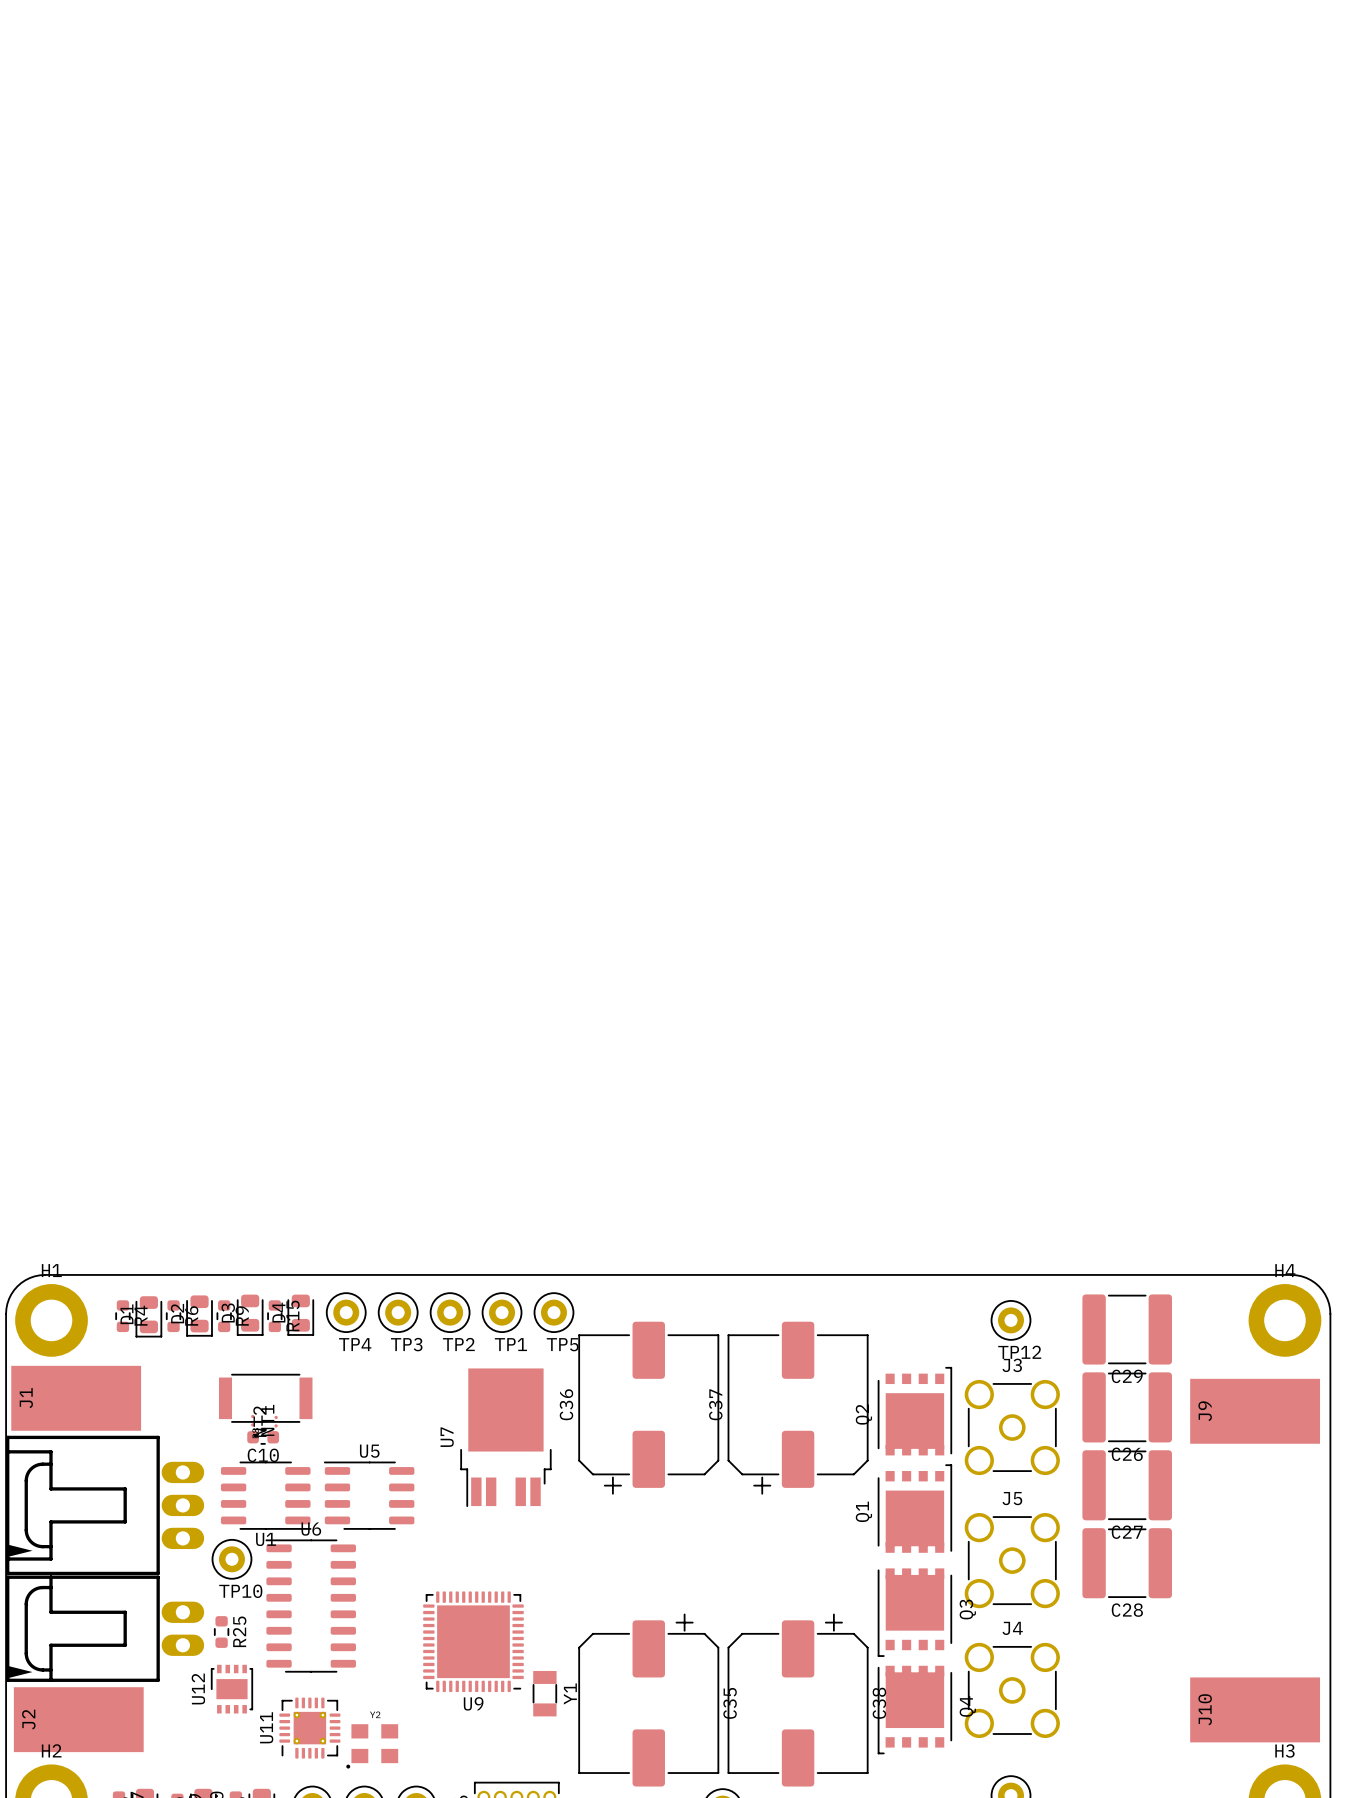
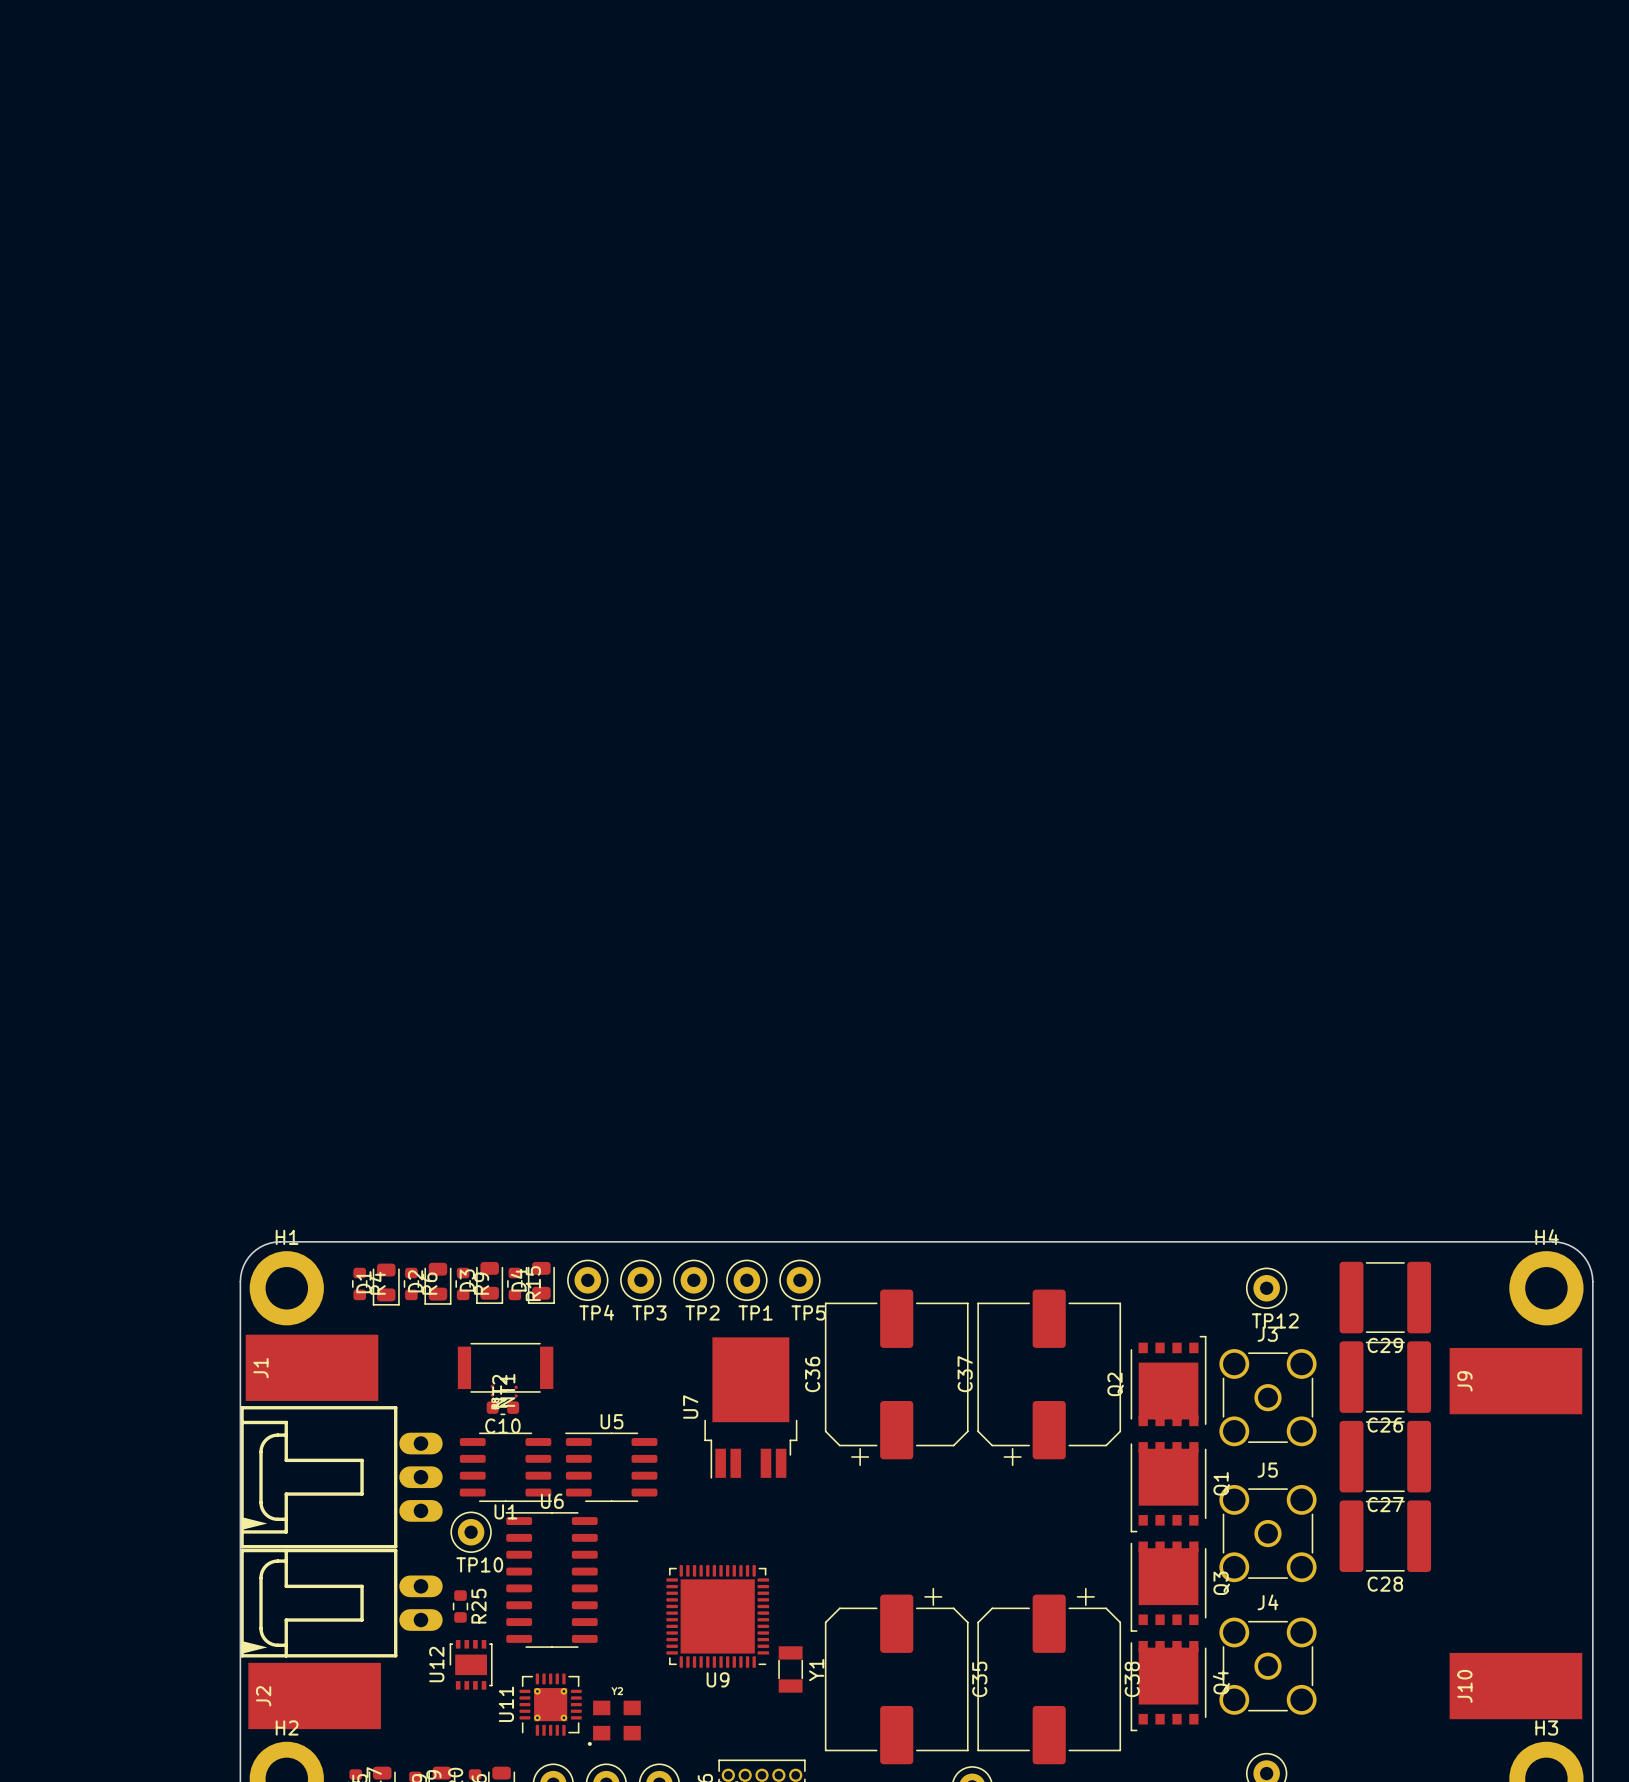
Q1 rotation: 0° (914, 1508) -> 180° (1168, 1487)

